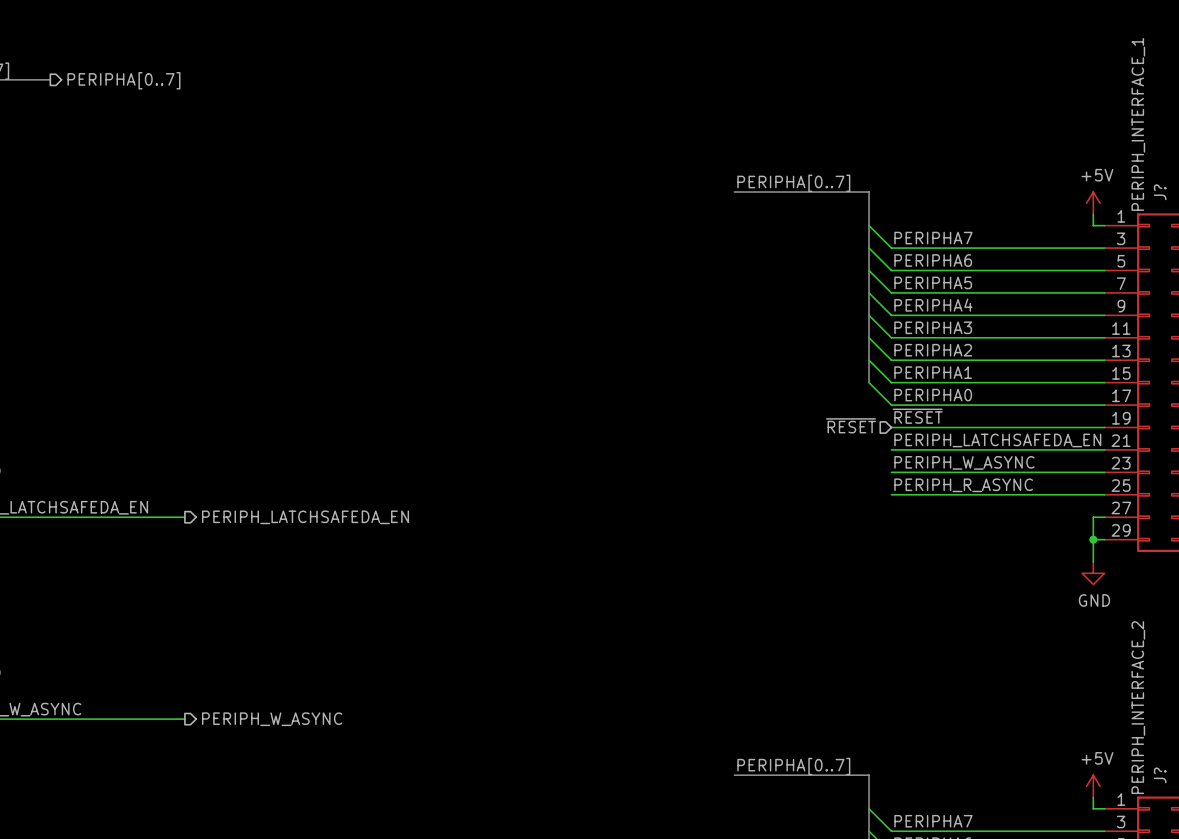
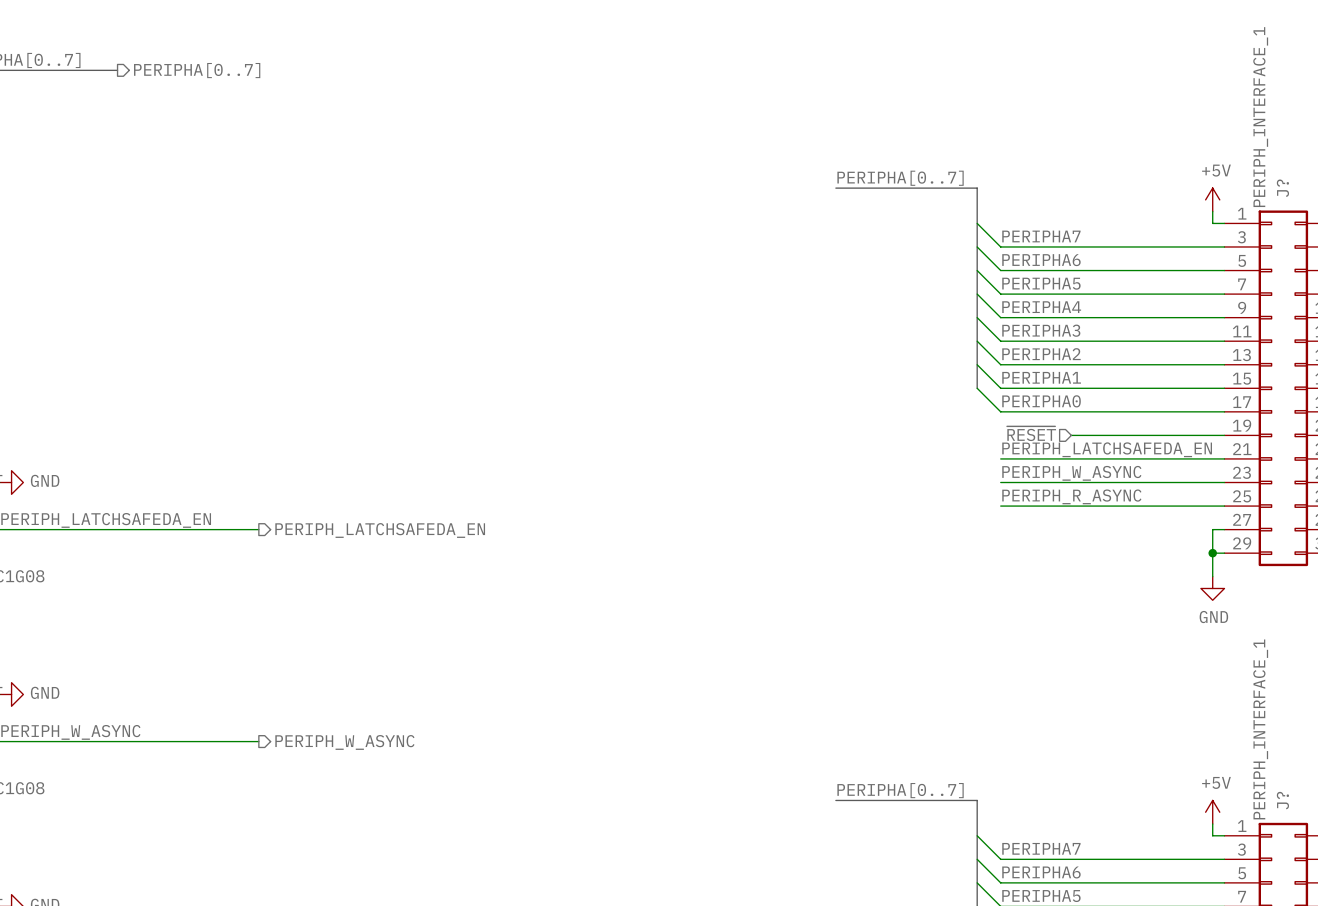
label: ~{RESET} (917, 416) -> none
hierarchical label position: ~{RESET} (850, 425) -> ~{RESET} (1031, 433)
wire: (891, 427) (958, 427) -> none
J? value: PERIPH_INTERFACE_2 (1138, 707) -> PERIPH_INTERFACE_1 (1260, 729)

